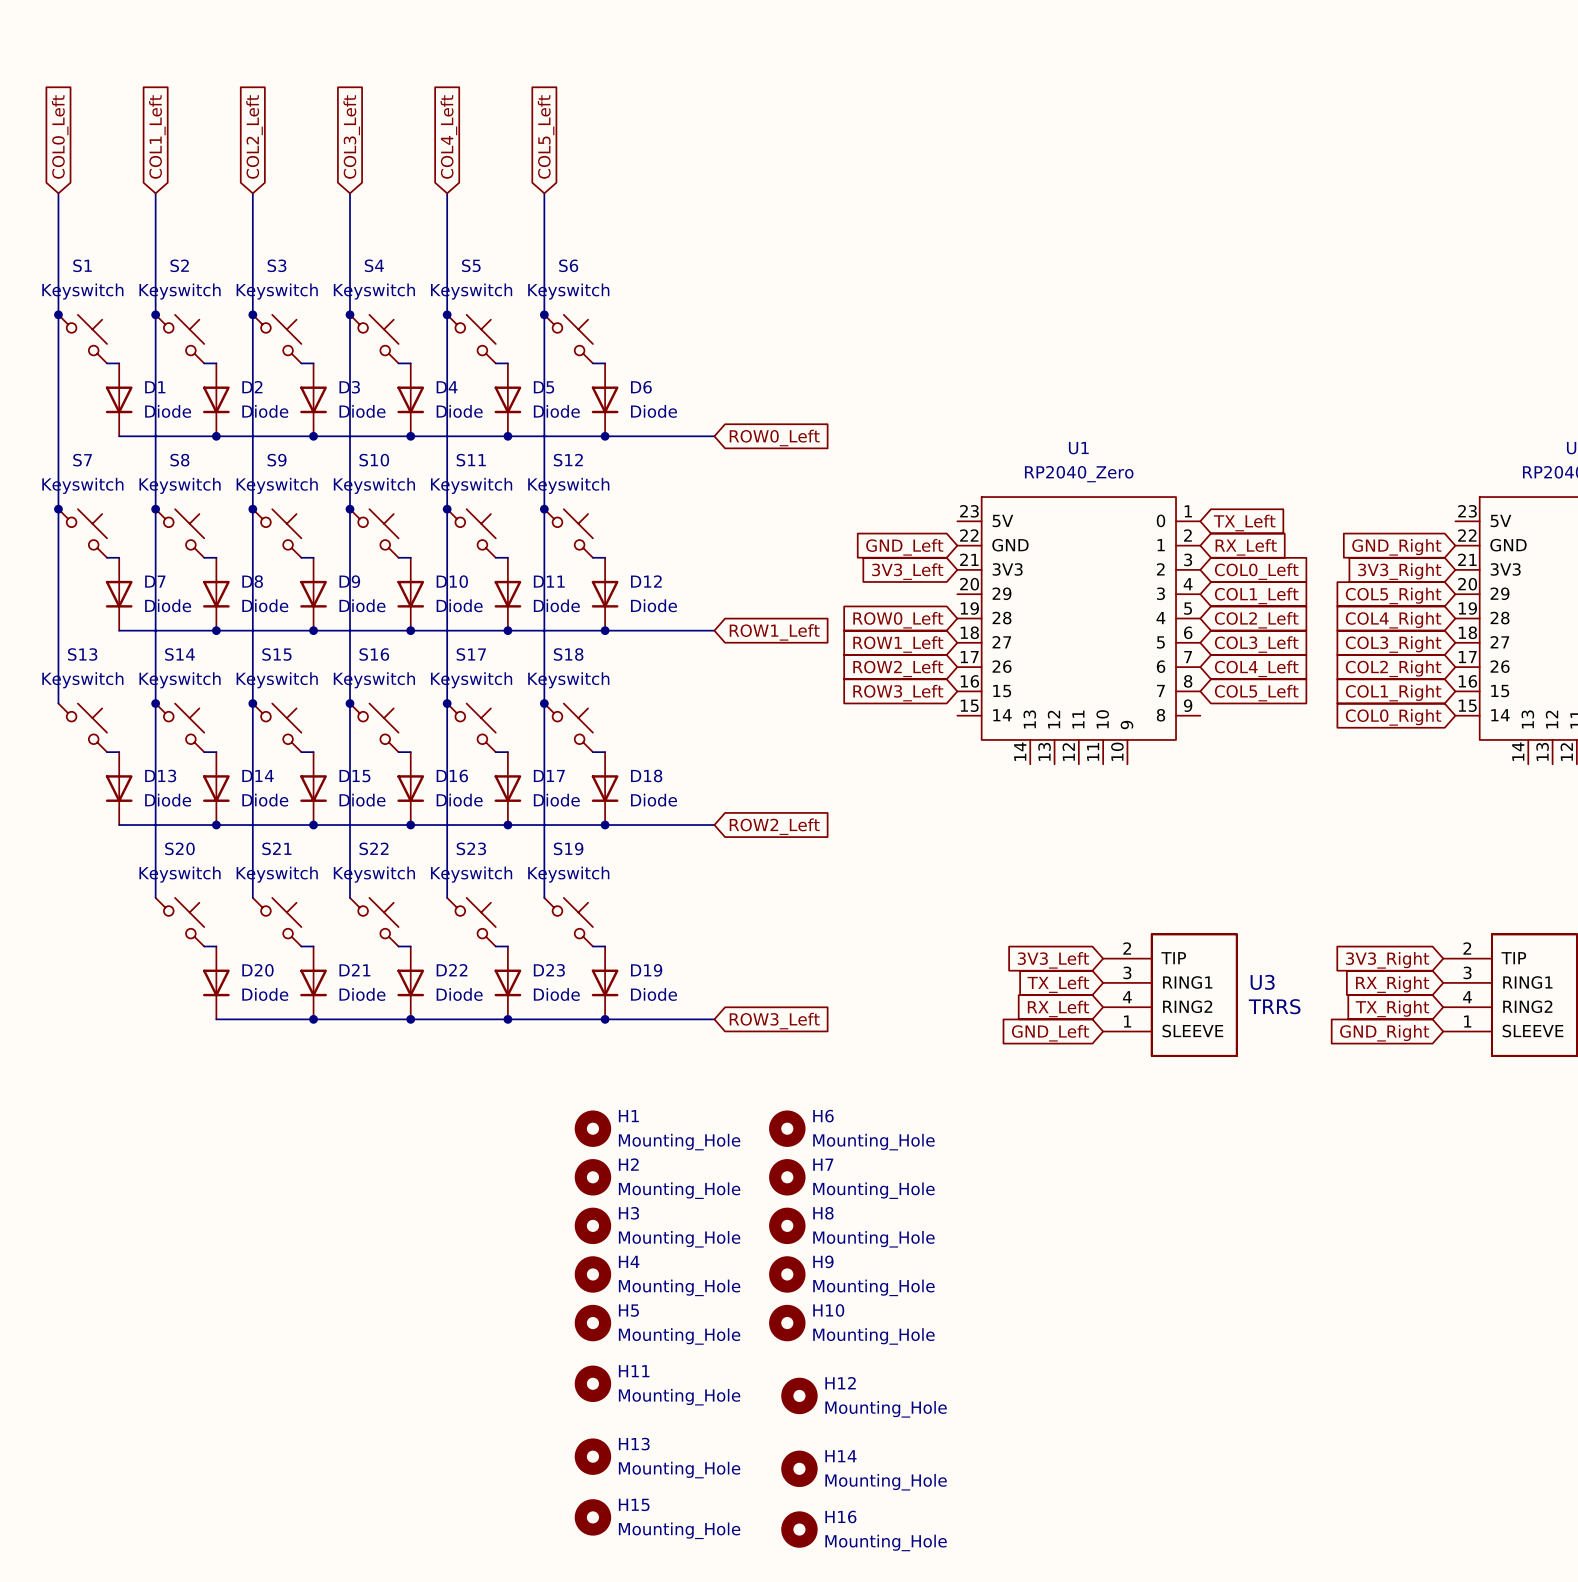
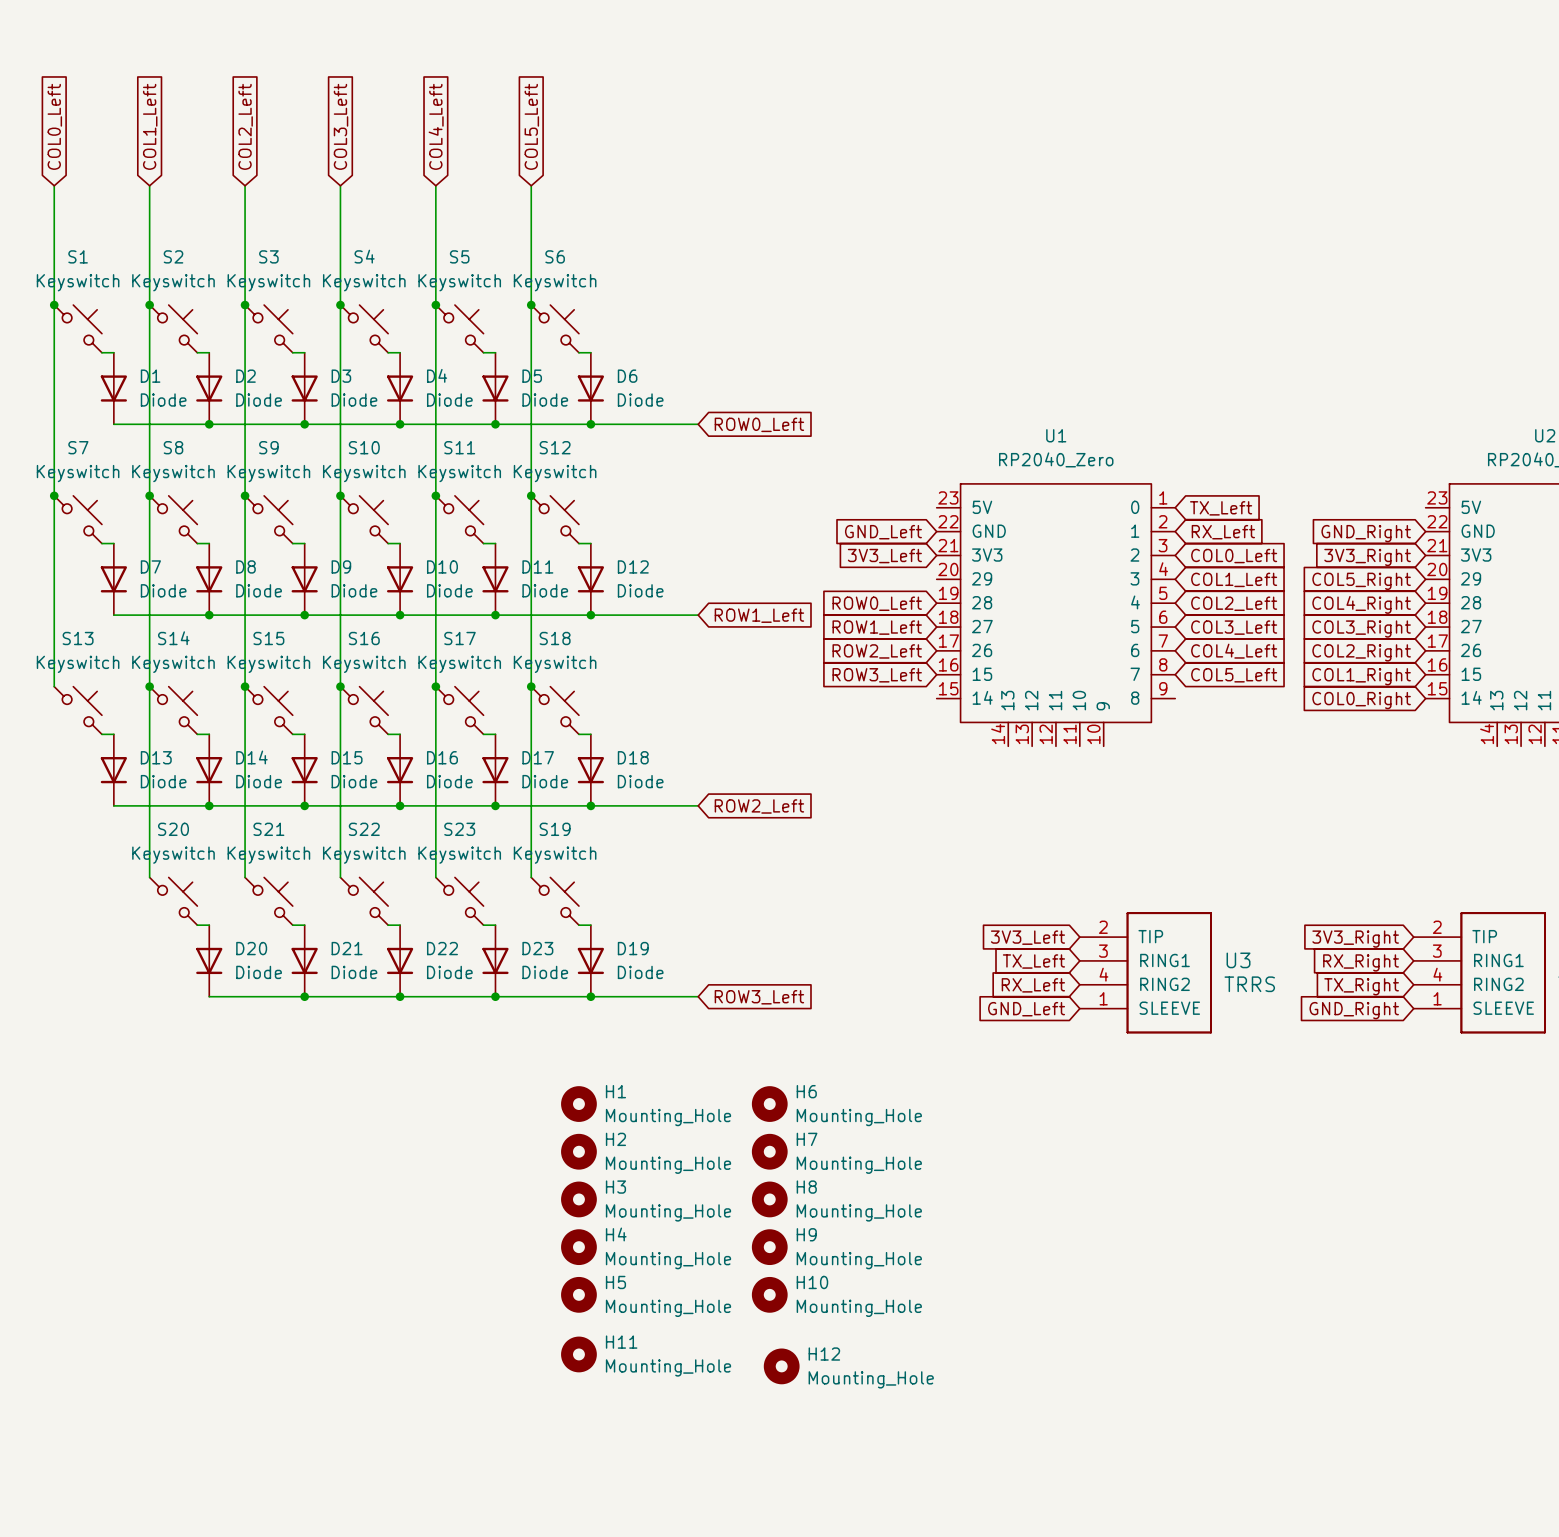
H13: Mounting_Hole (592, 1456) -> none
H14: Mounting_Hole (799, 1468) -> none
H15: Mounting_Hole (592, 1517) -> none
H16: Mounting_Hole (799, 1529) -> none

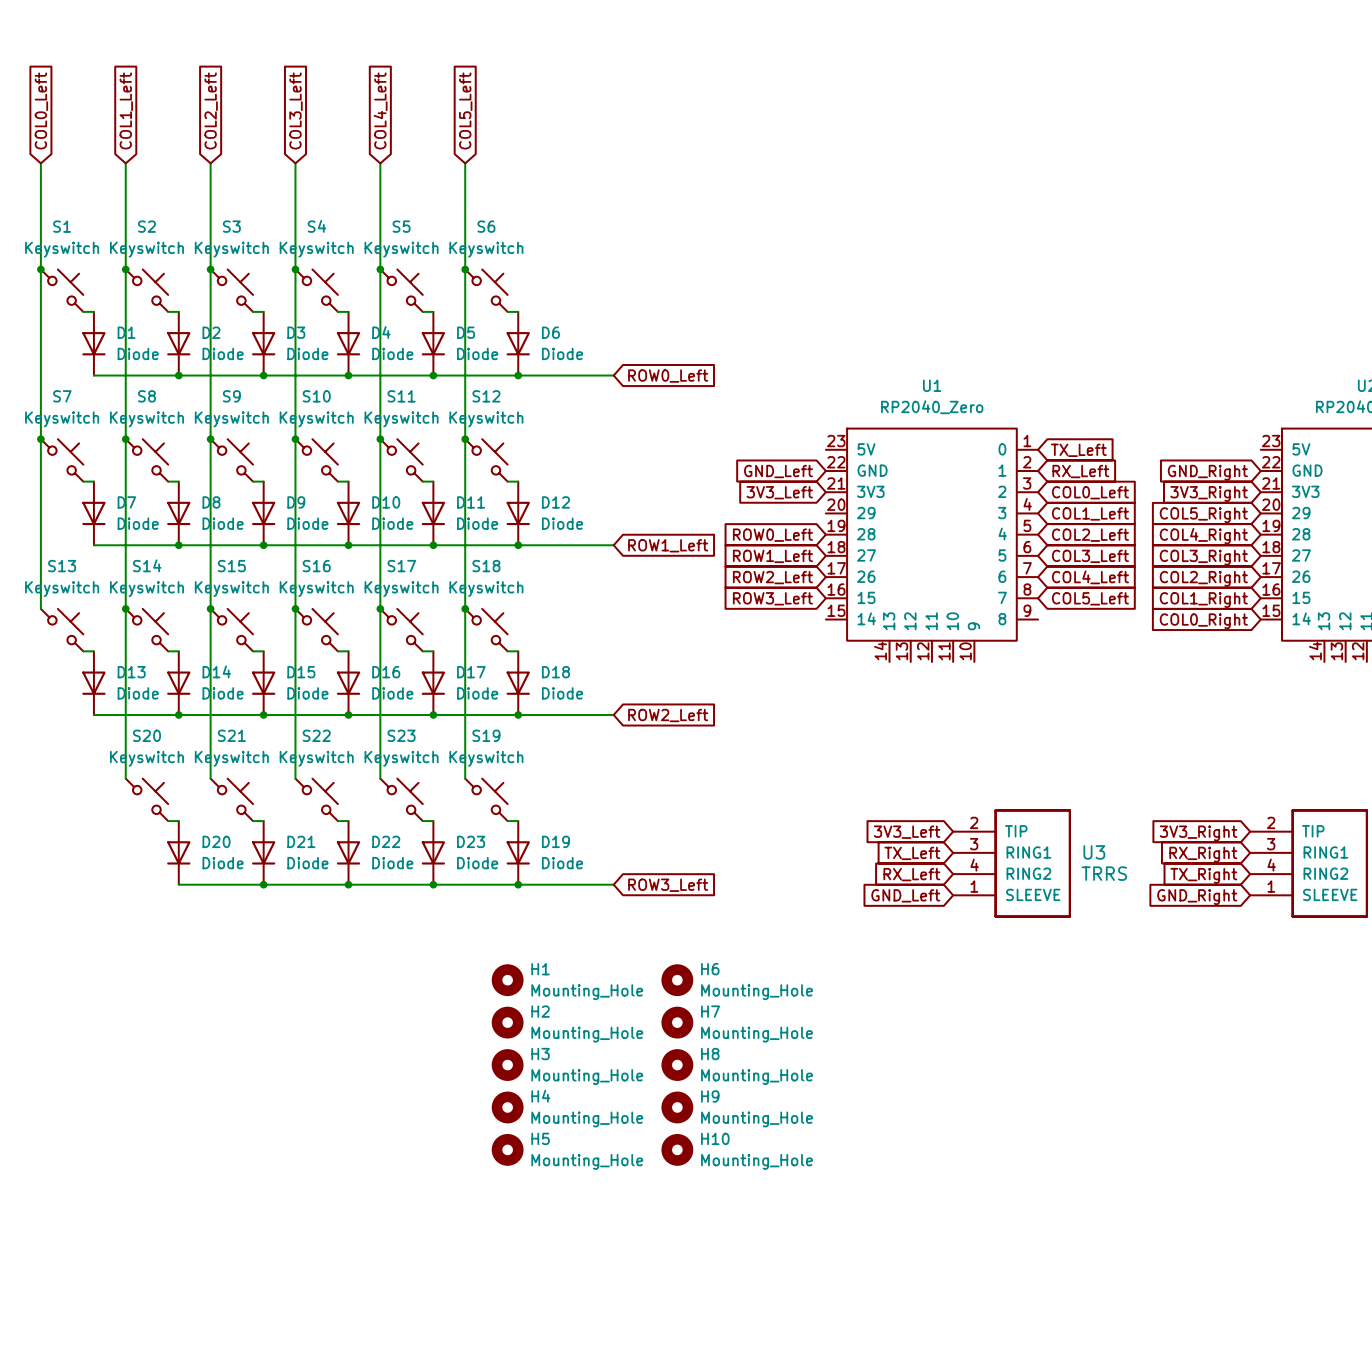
H11: Mounting_Hole (578, 1354) -> none
H12: Mounting_Hole (781, 1366) -> none

